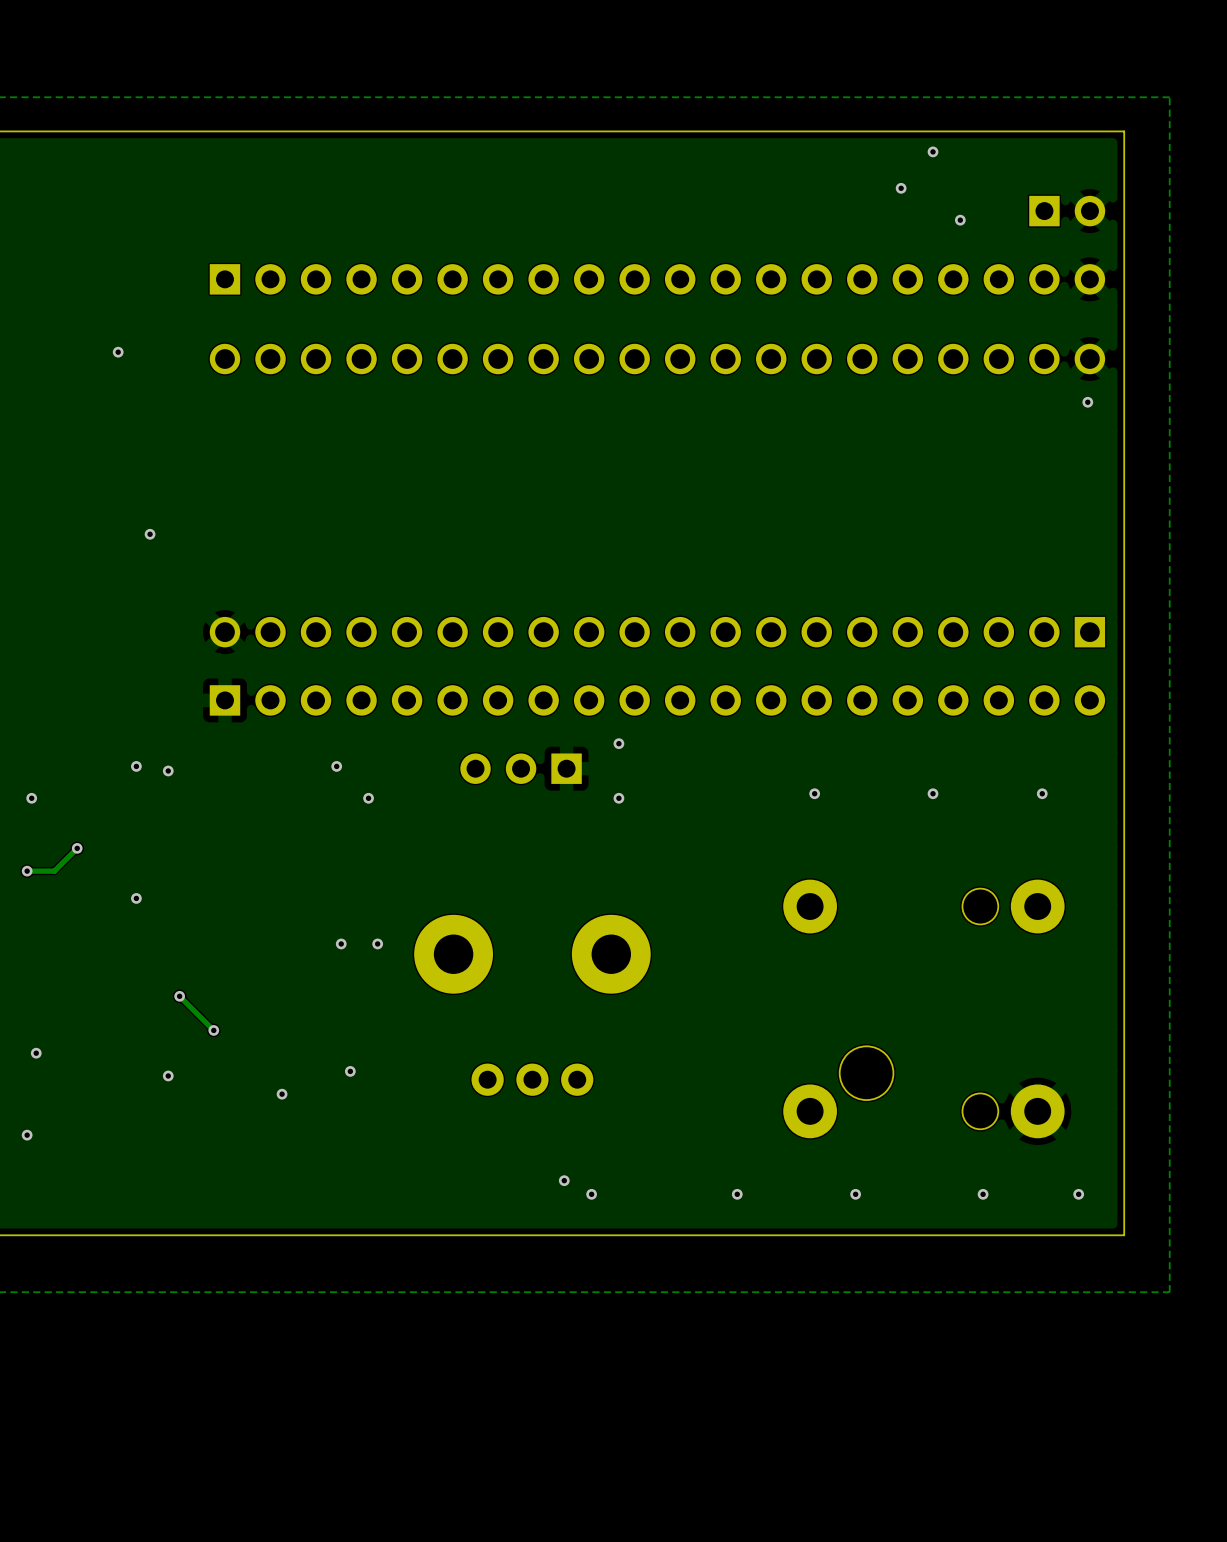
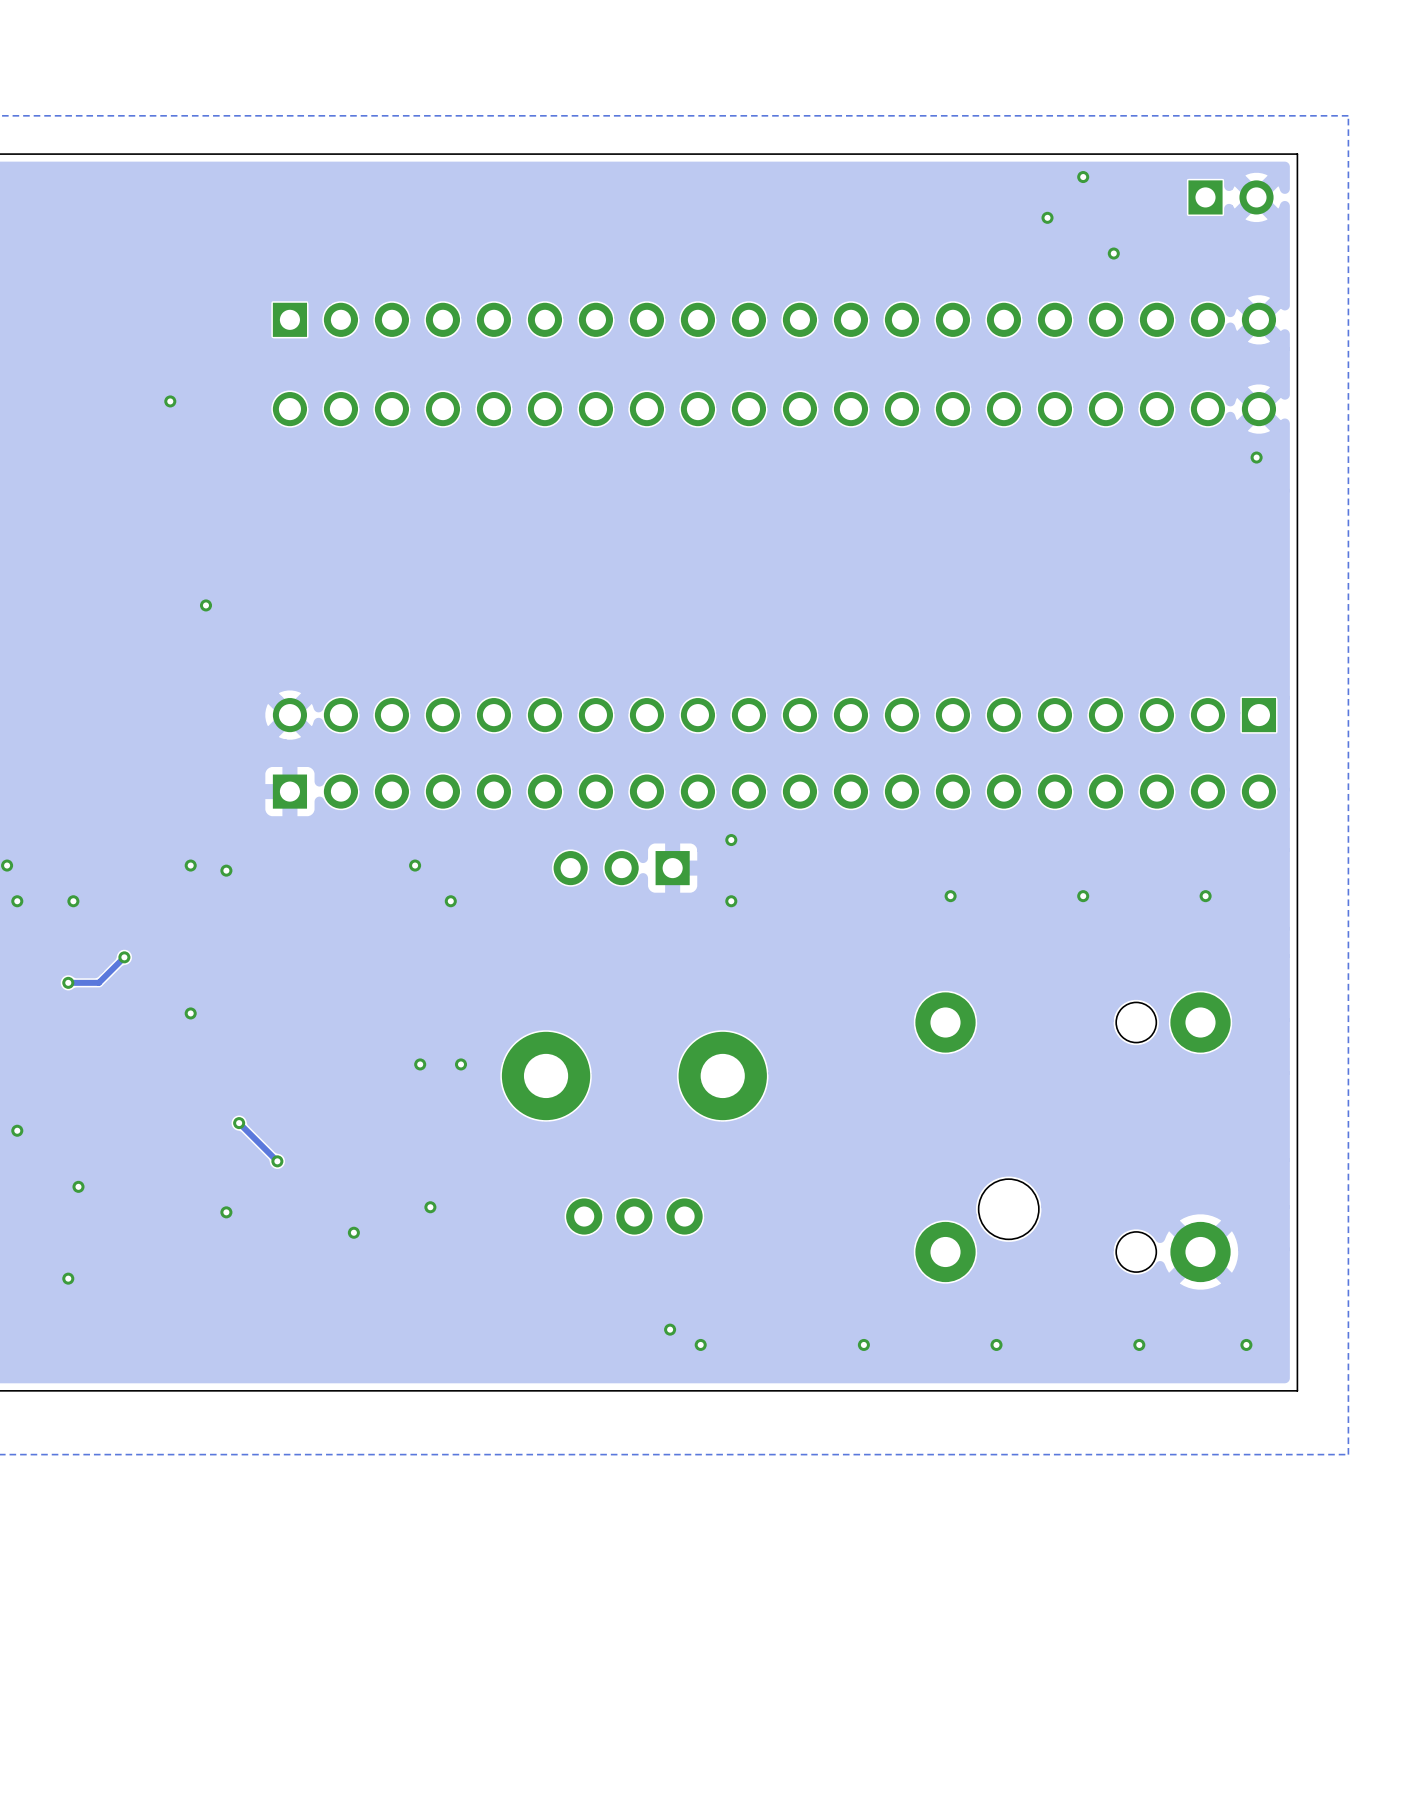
part position: (1067, 211) -> (1231, 197)

